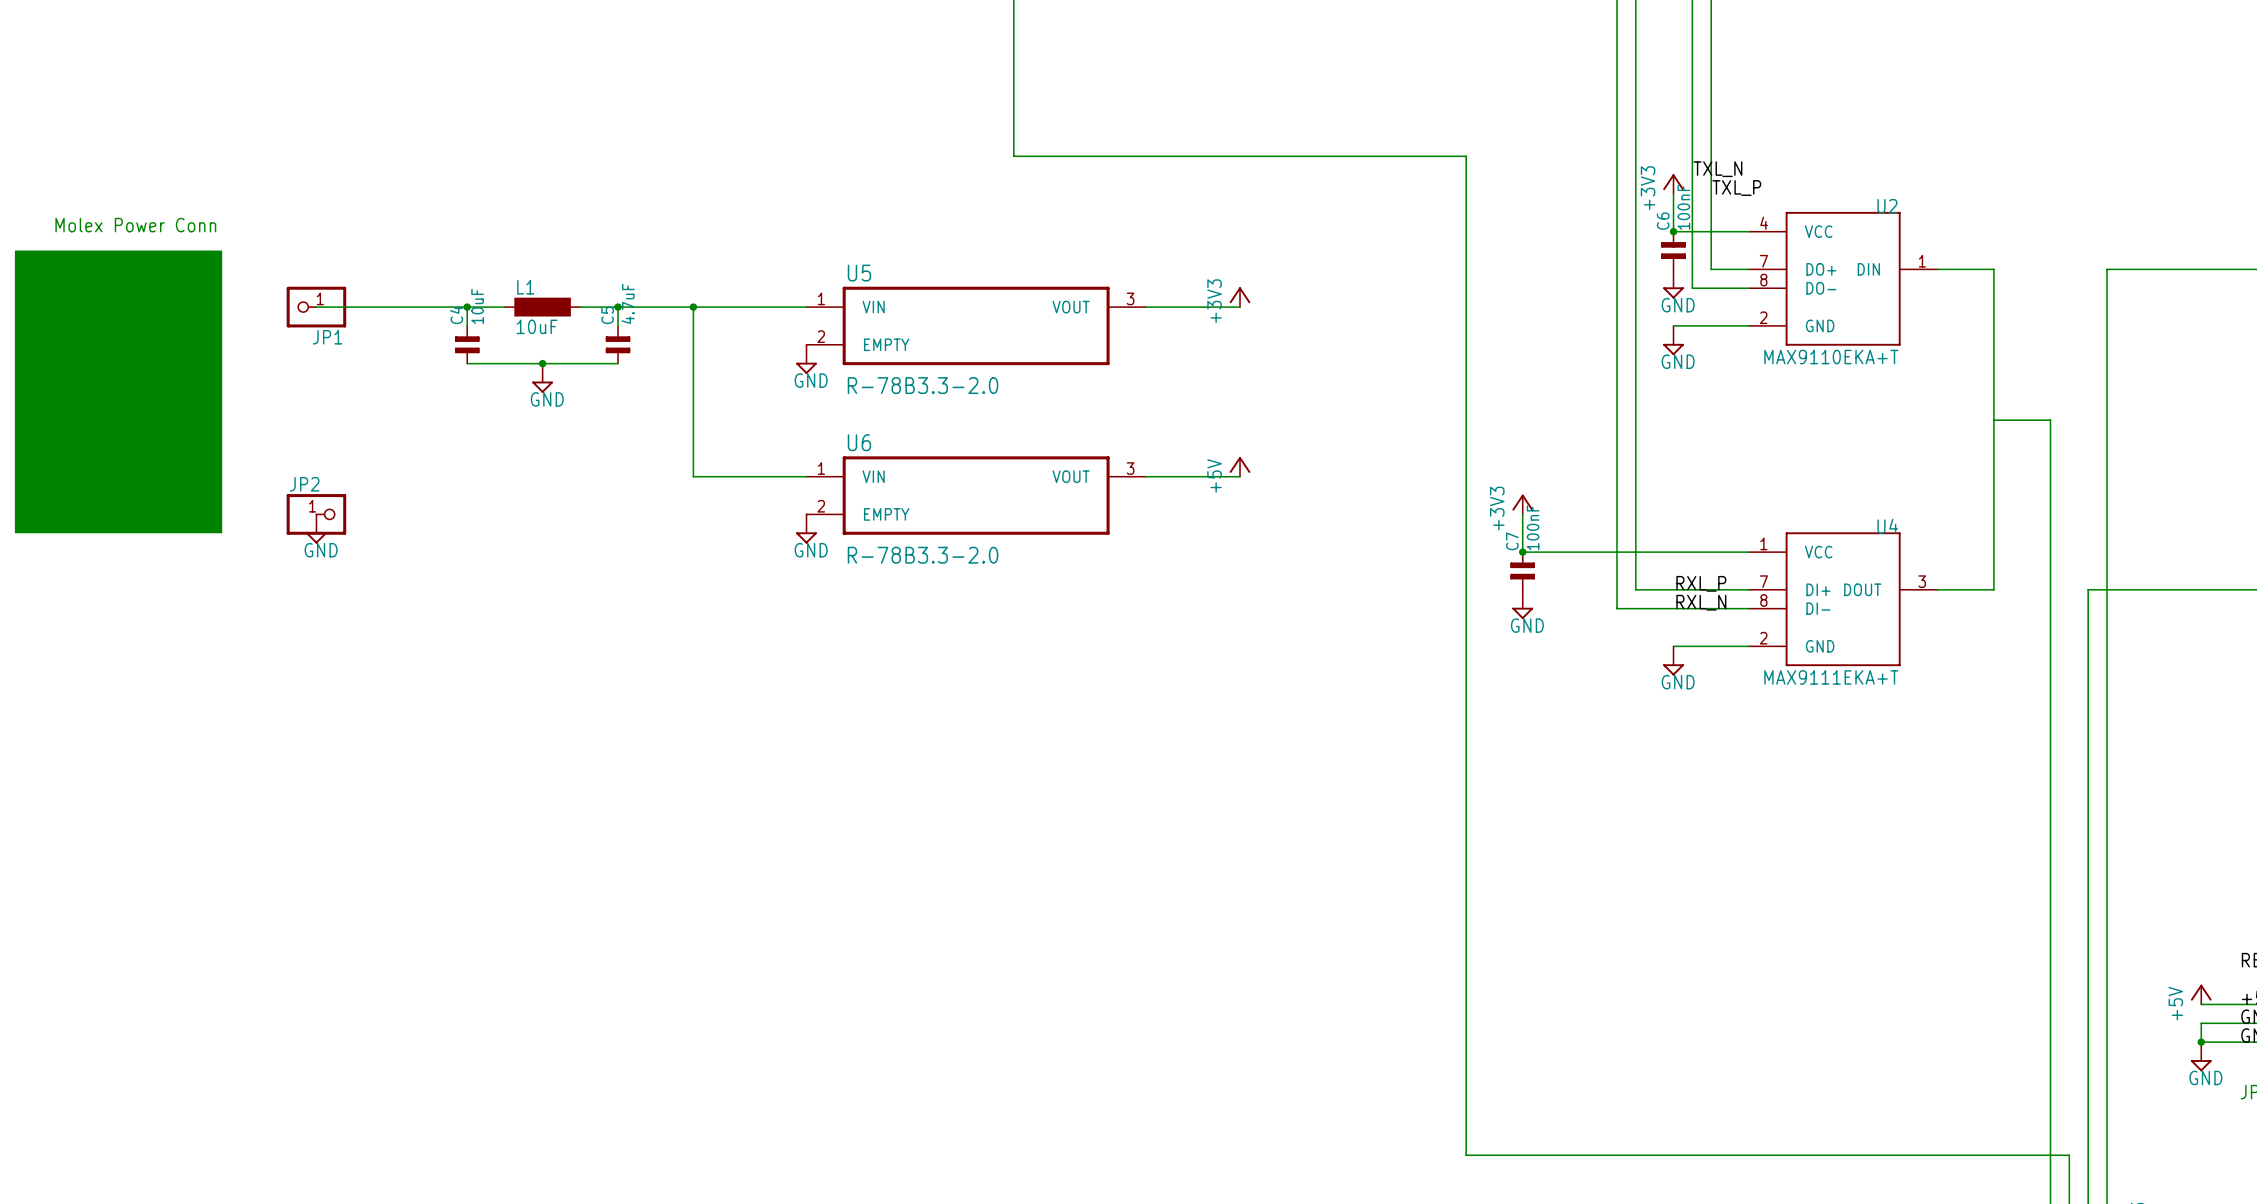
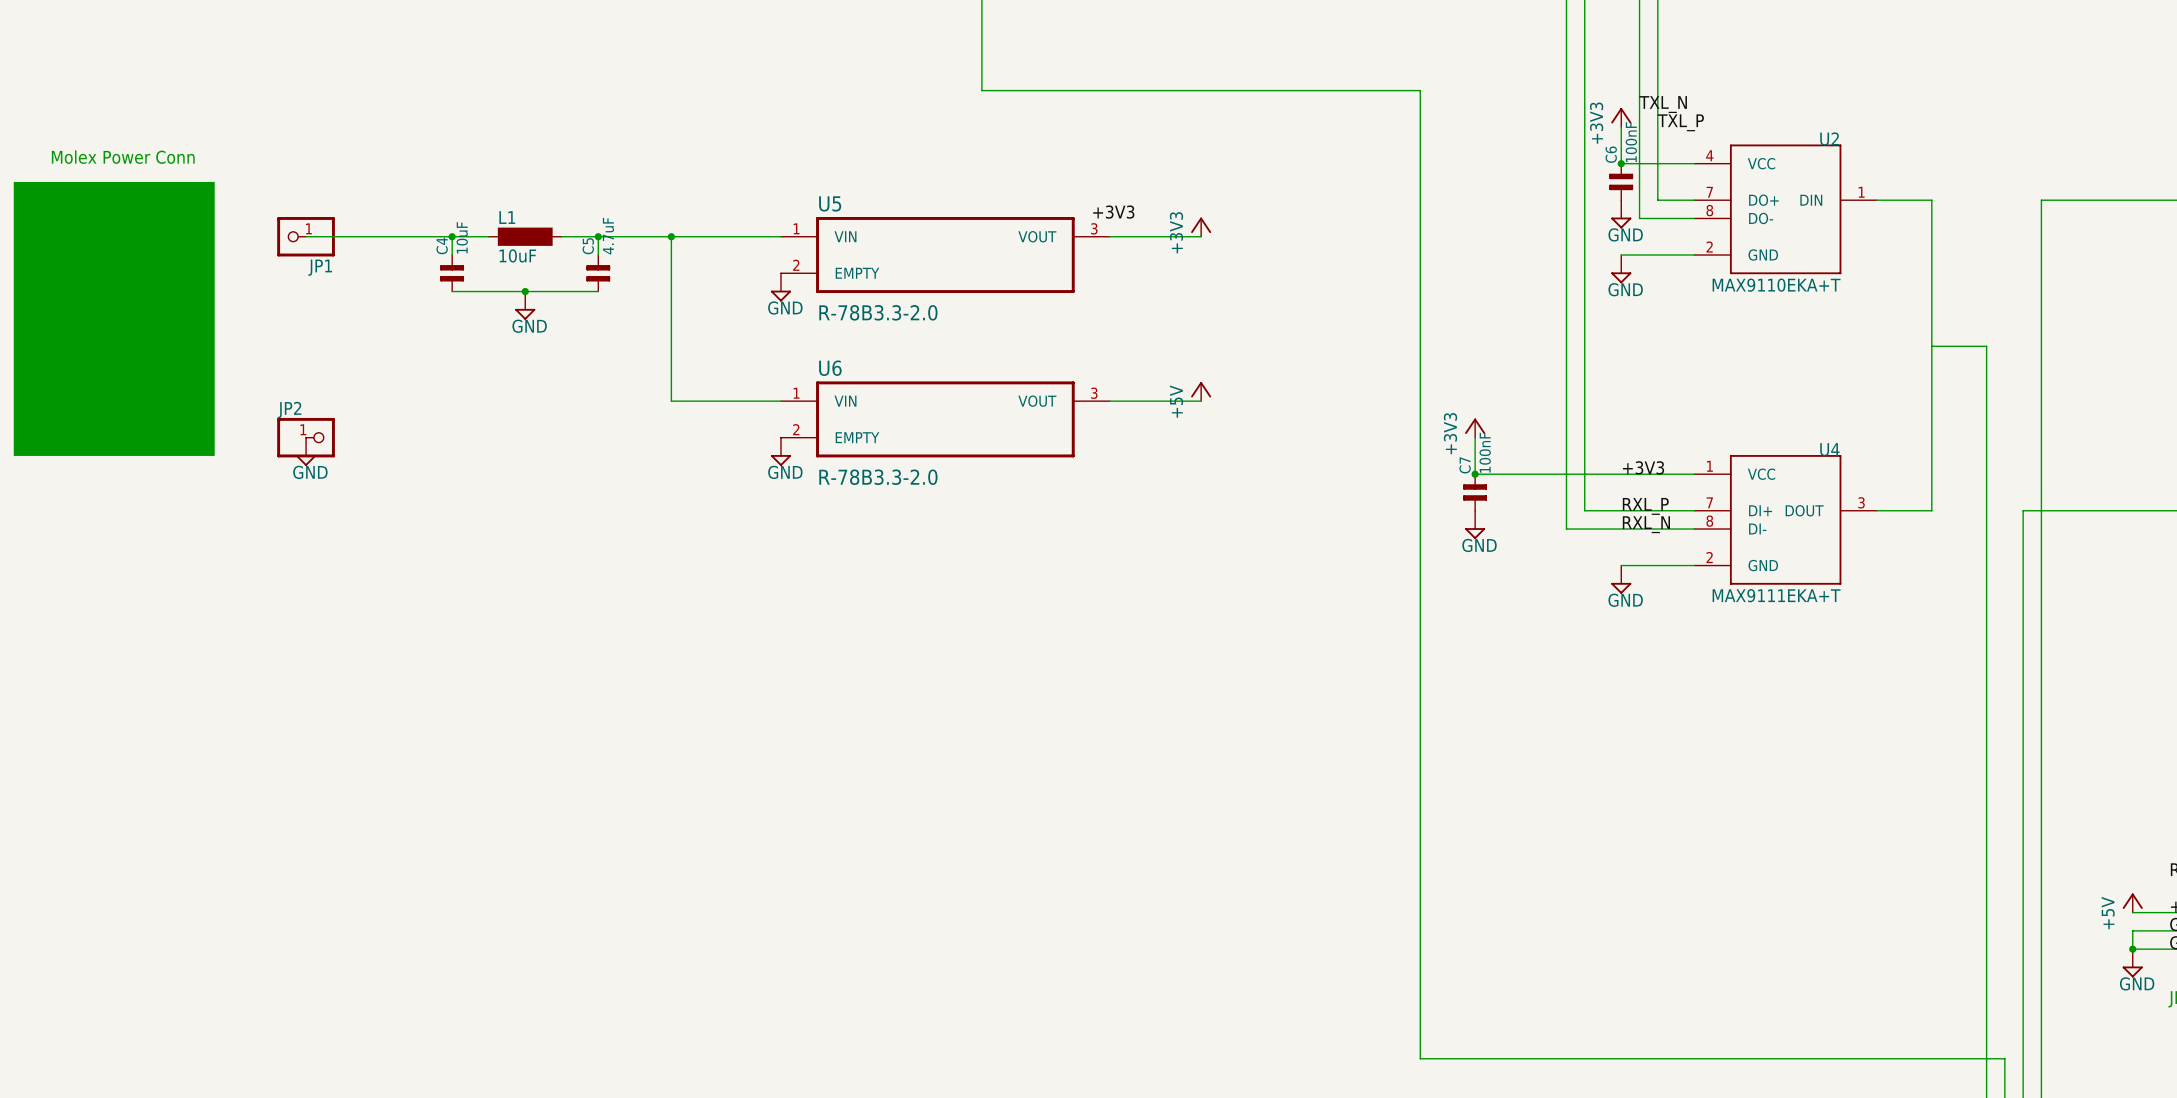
label: none -> +3V3 (1113, 212)
label: none -> +3V3 (1643, 467)

